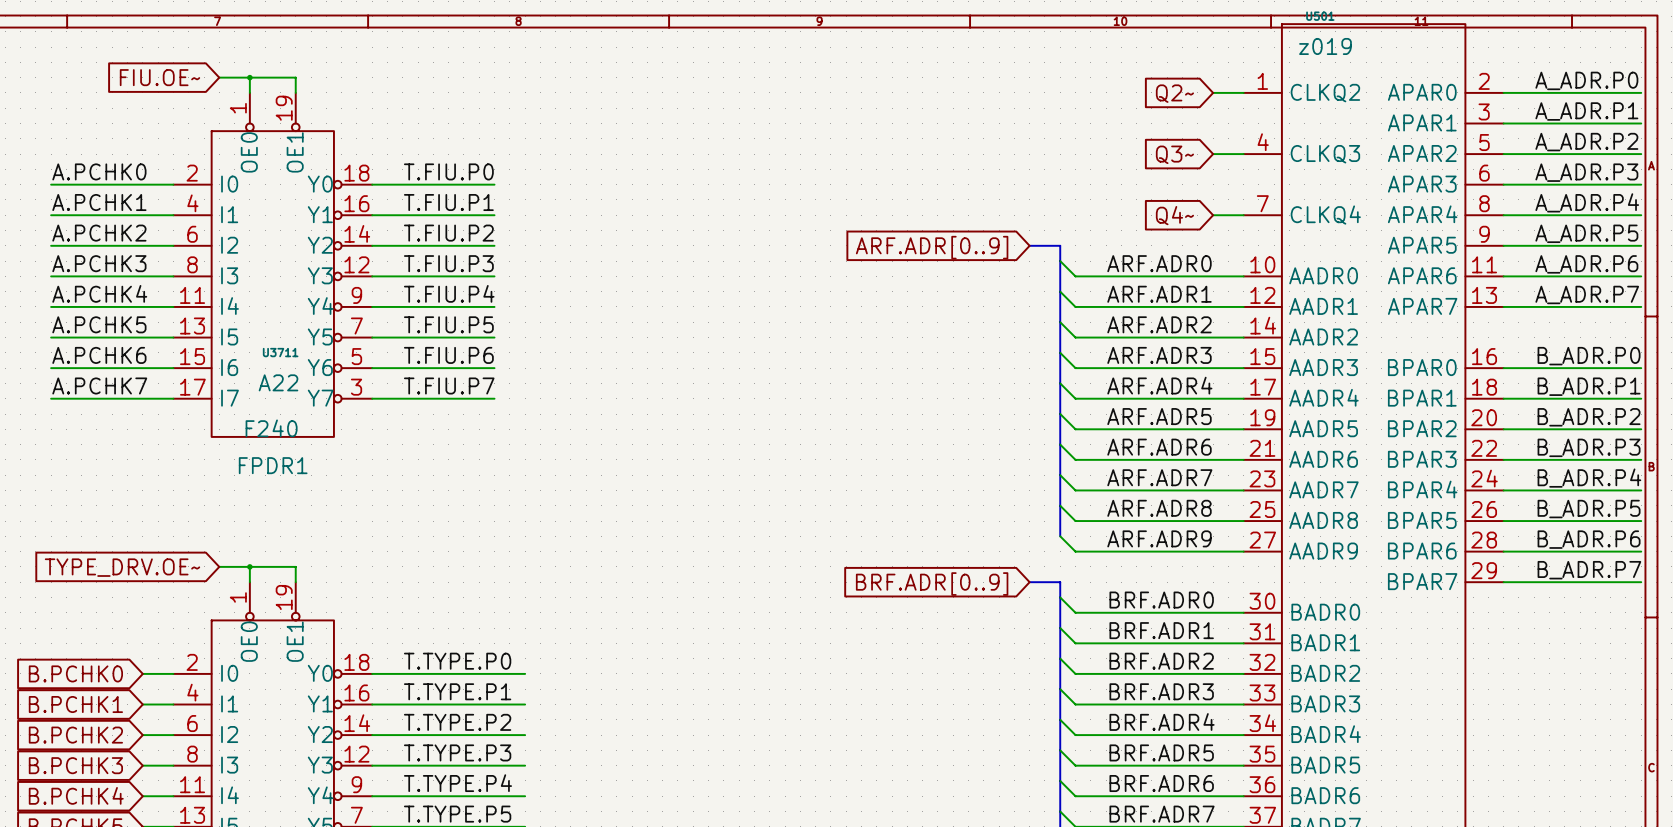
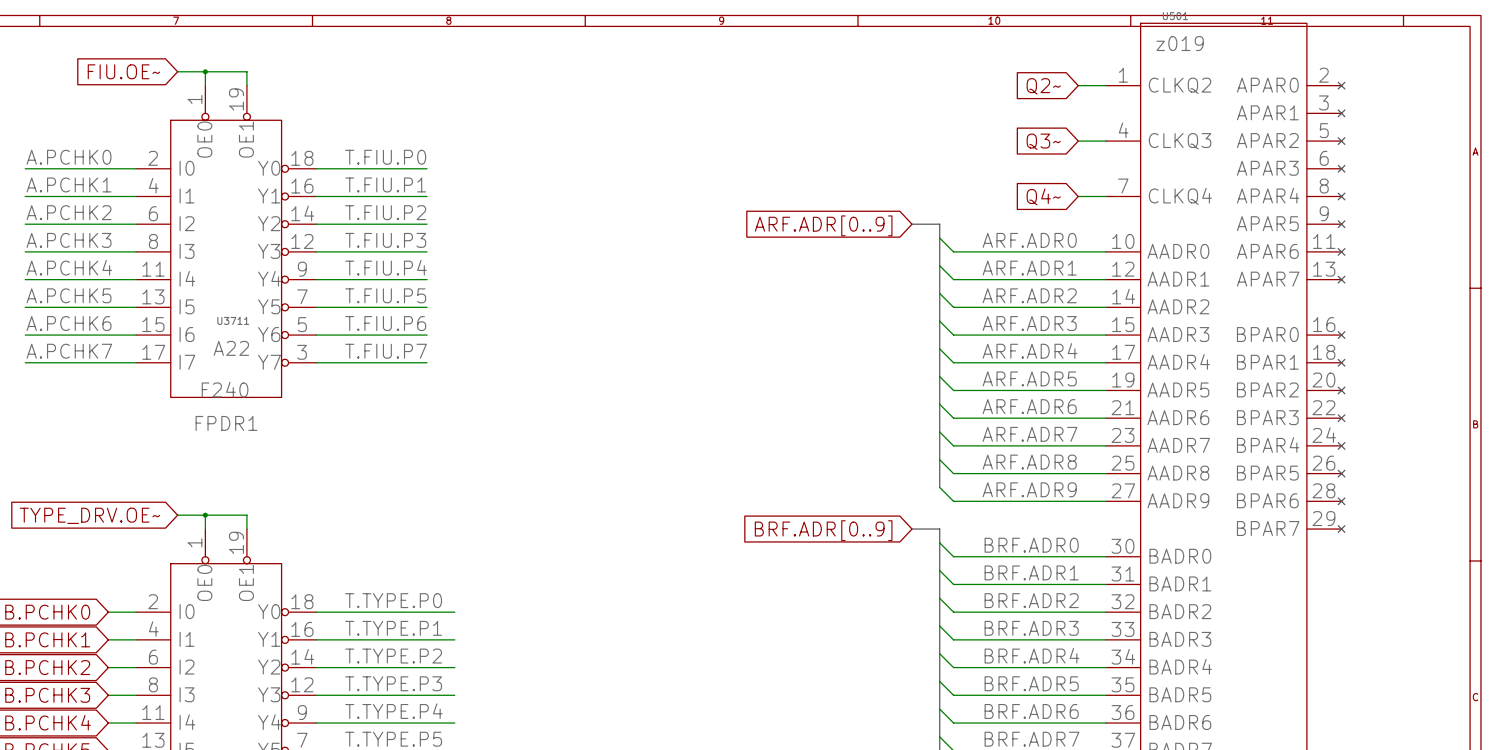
label: A_ADR.P0 (1586, 80) -> none
wire: (1503, 92) (1641, 92) -> none
no-connect mark: none -> (1341, 85)
label: A_ADR.P1 (1586, 111) -> none
wire: (1503, 123) (1641, 123) -> none
no-connect mark: none -> (1341, 113)
label: A_ADR.P2 (1586, 142) -> none
wire: (1503, 154) (1641, 154) -> none
no-connect mark: none -> (1341, 141)
label: A_ADR.P3 (1586, 172) -> none
wire: (1503, 184) (1641, 184) -> none
no-connect mark: none -> (1341, 168)
label: A_ADR.P4 (1587, 202) -> none
wire: (1503, 215) (1641, 215) -> none
no-connect mark: none -> (1341, 196)
label: A_ADR.P5 (1586, 233) -> none
wire: (1503, 245) (1641, 245) -> none
no-connect mark: none -> (1341, 224)
label: A_ADR.P6 (1586, 264) -> none
wire: (1503, 276) (1641, 276) -> none
no-connect mark: none -> (1341, 251)
label: A_ADR.P7 (1587, 294) -> none
wire: (1503, 306) (1641, 306) -> none
no-connect mark: none -> (1341, 279)
label: B_ADR.P0 (1589, 356) -> none
wire: (1503, 368) (1641, 368) -> none
no-connect mark: none -> (1341, 335)
label: B_ADR.P1 (1589, 386) -> none
wire: (1503, 398) (1641, 398) -> none
no-connect mark: none -> (1341, 362)
label: B_ADR.P2 (1589, 417) -> none
wire: (1503, 429) (1641, 429) -> none
no-connect mark: none -> (1341, 390)
label: B_ADR.P3 (1589, 447) -> none
wire: (1503, 459) (1641, 459) -> none
no-connect mark: none -> (1341, 418)
label: B_ADR.P4 (1589, 478) -> none
wire: (1503, 490) (1641, 490) -> none
no-connect mark: none -> (1341, 445)
label: B_ADR.P5 (1589, 509) -> none
wire: (1503, 521) (1641, 521) -> none
no-connect mark: none -> (1341, 473)
label: B_ADR.P6 (1589, 539) -> none
wire: (1503, 551) (1641, 551) -> none
no-connect mark: none -> (1341, 501)
label: B_ADR.P7 (1589, 570) -> none
wire: (1503, 582) (1641, 582) -> none
no-connect mark: none -> (1341, 529)

